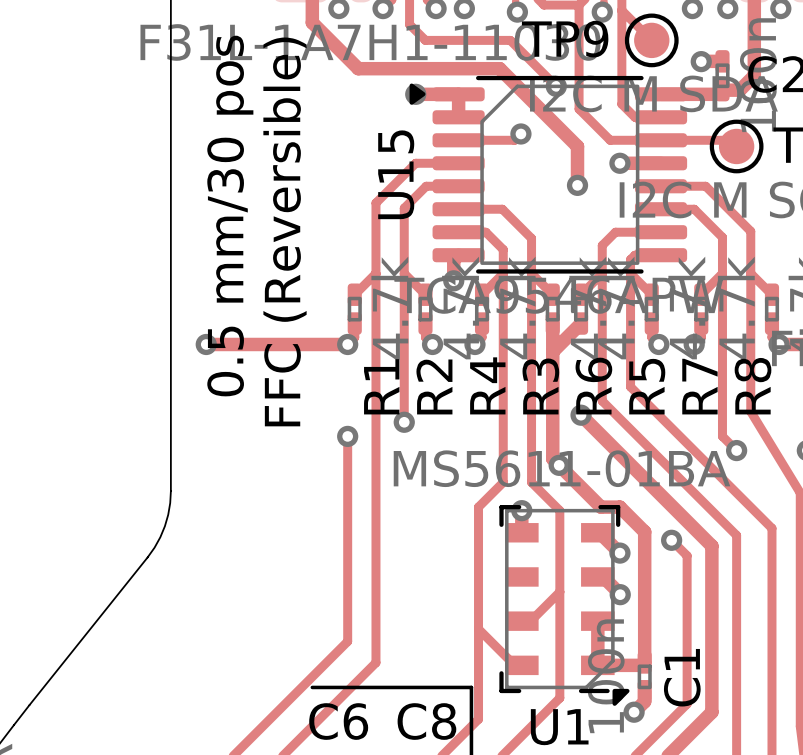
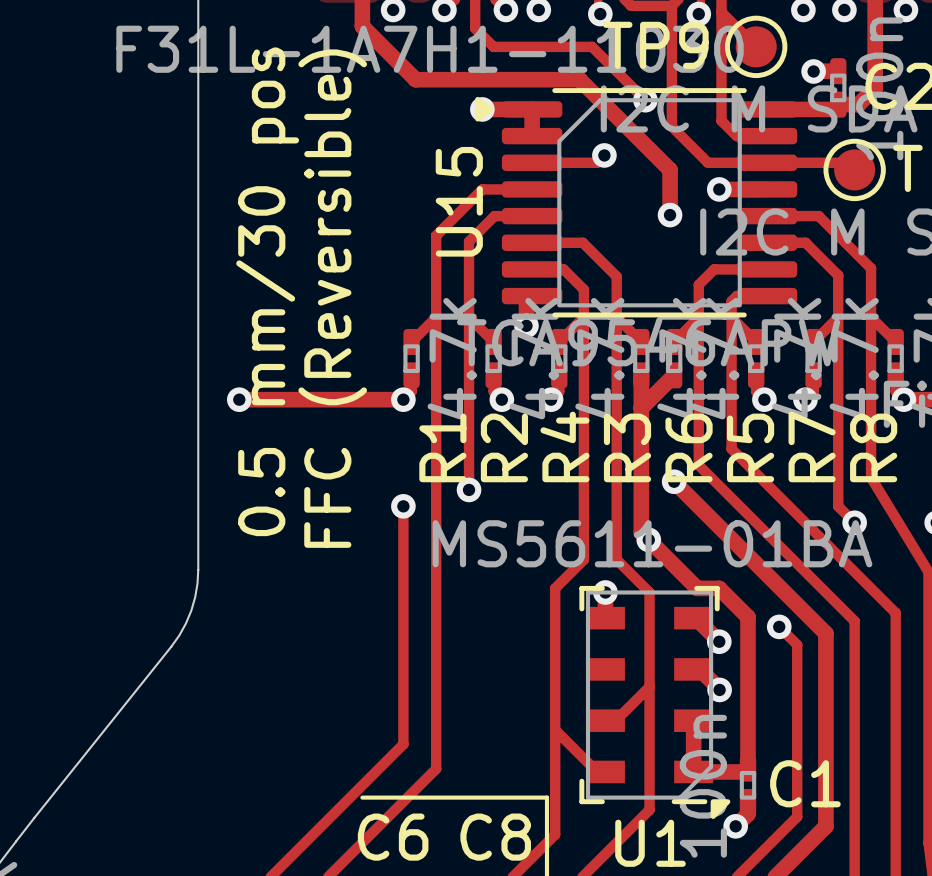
C1 name rotation: 0° (682, 677) -> 90° clockwise (805, 783)

